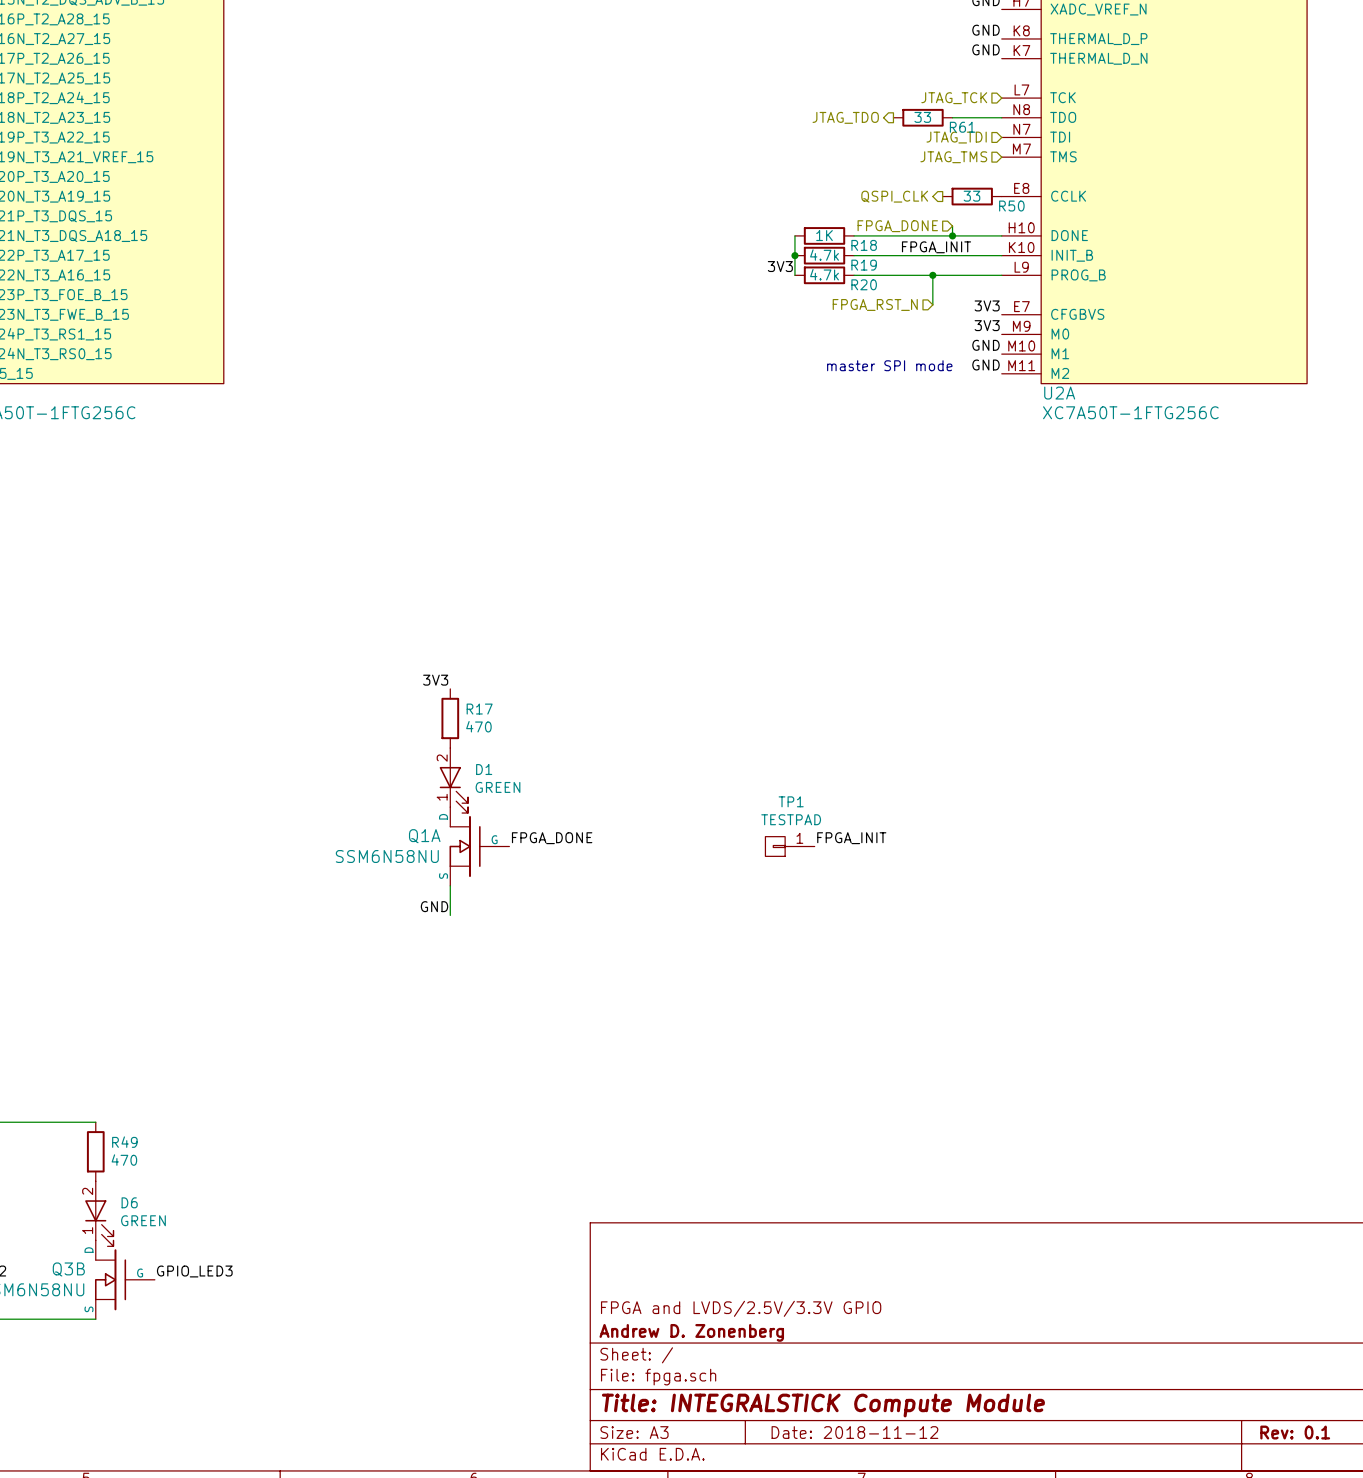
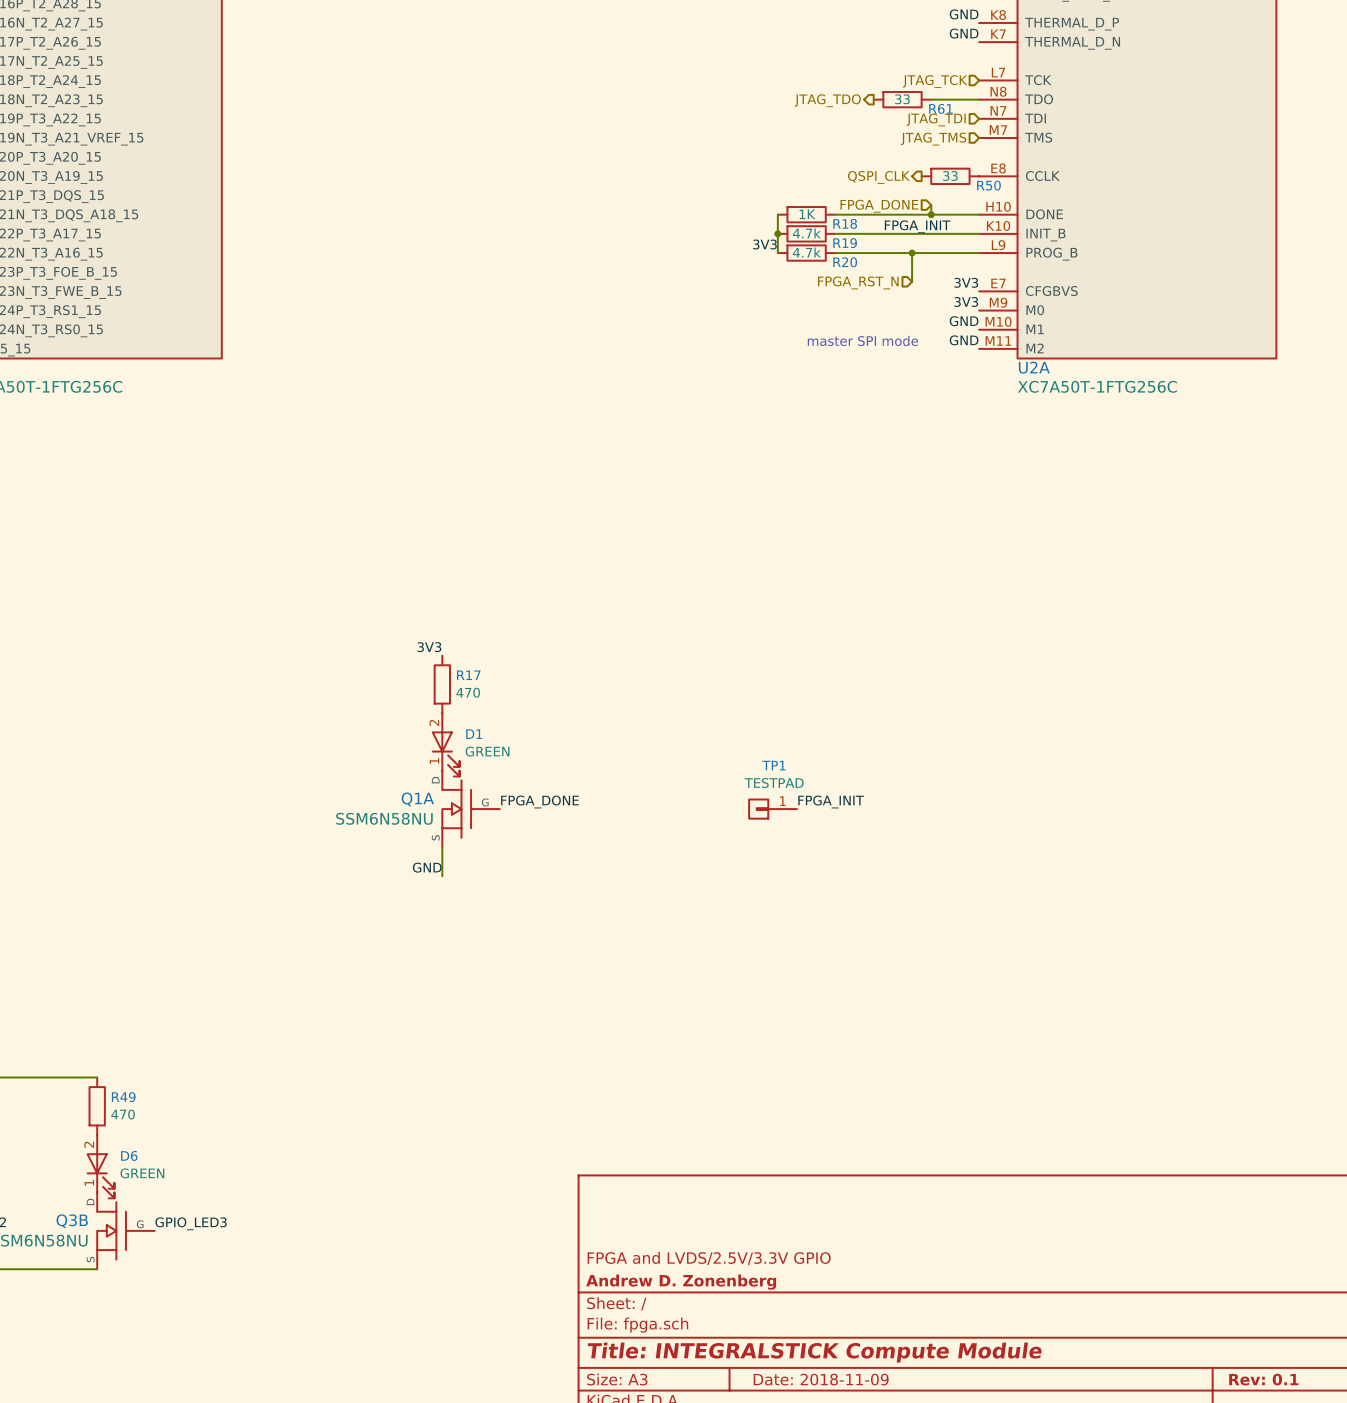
title block: Date: 2018-11-12 (854, 1432) -> Date: 2018-11-09 (821, 1379)

